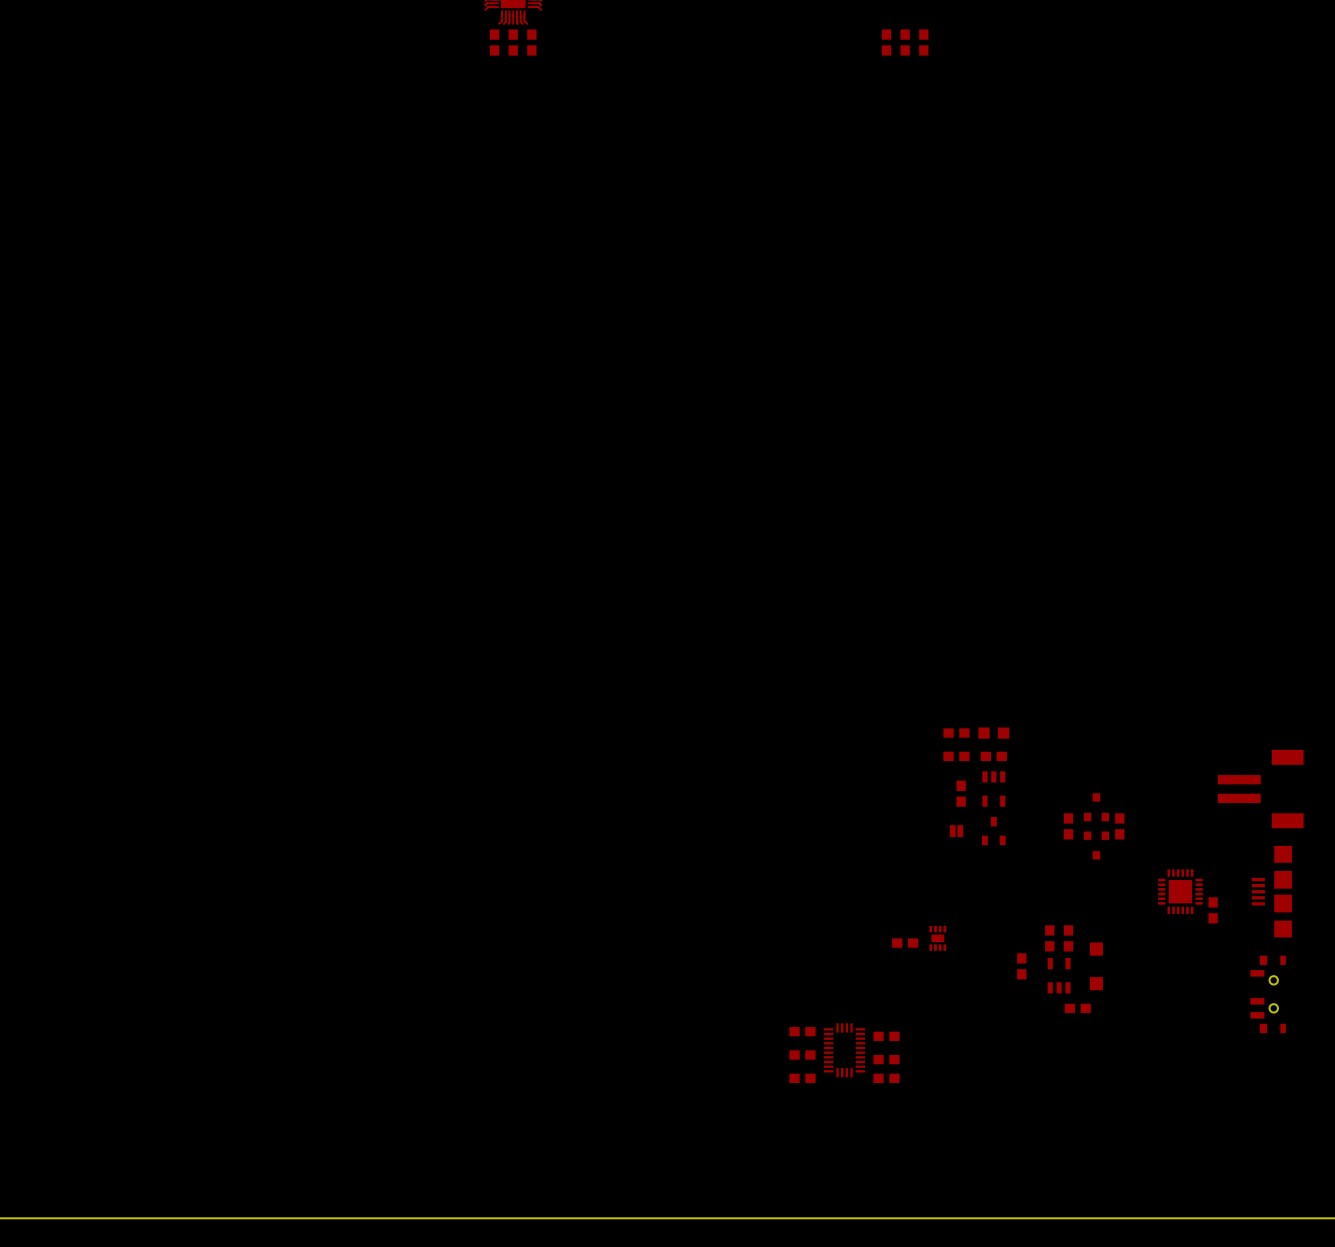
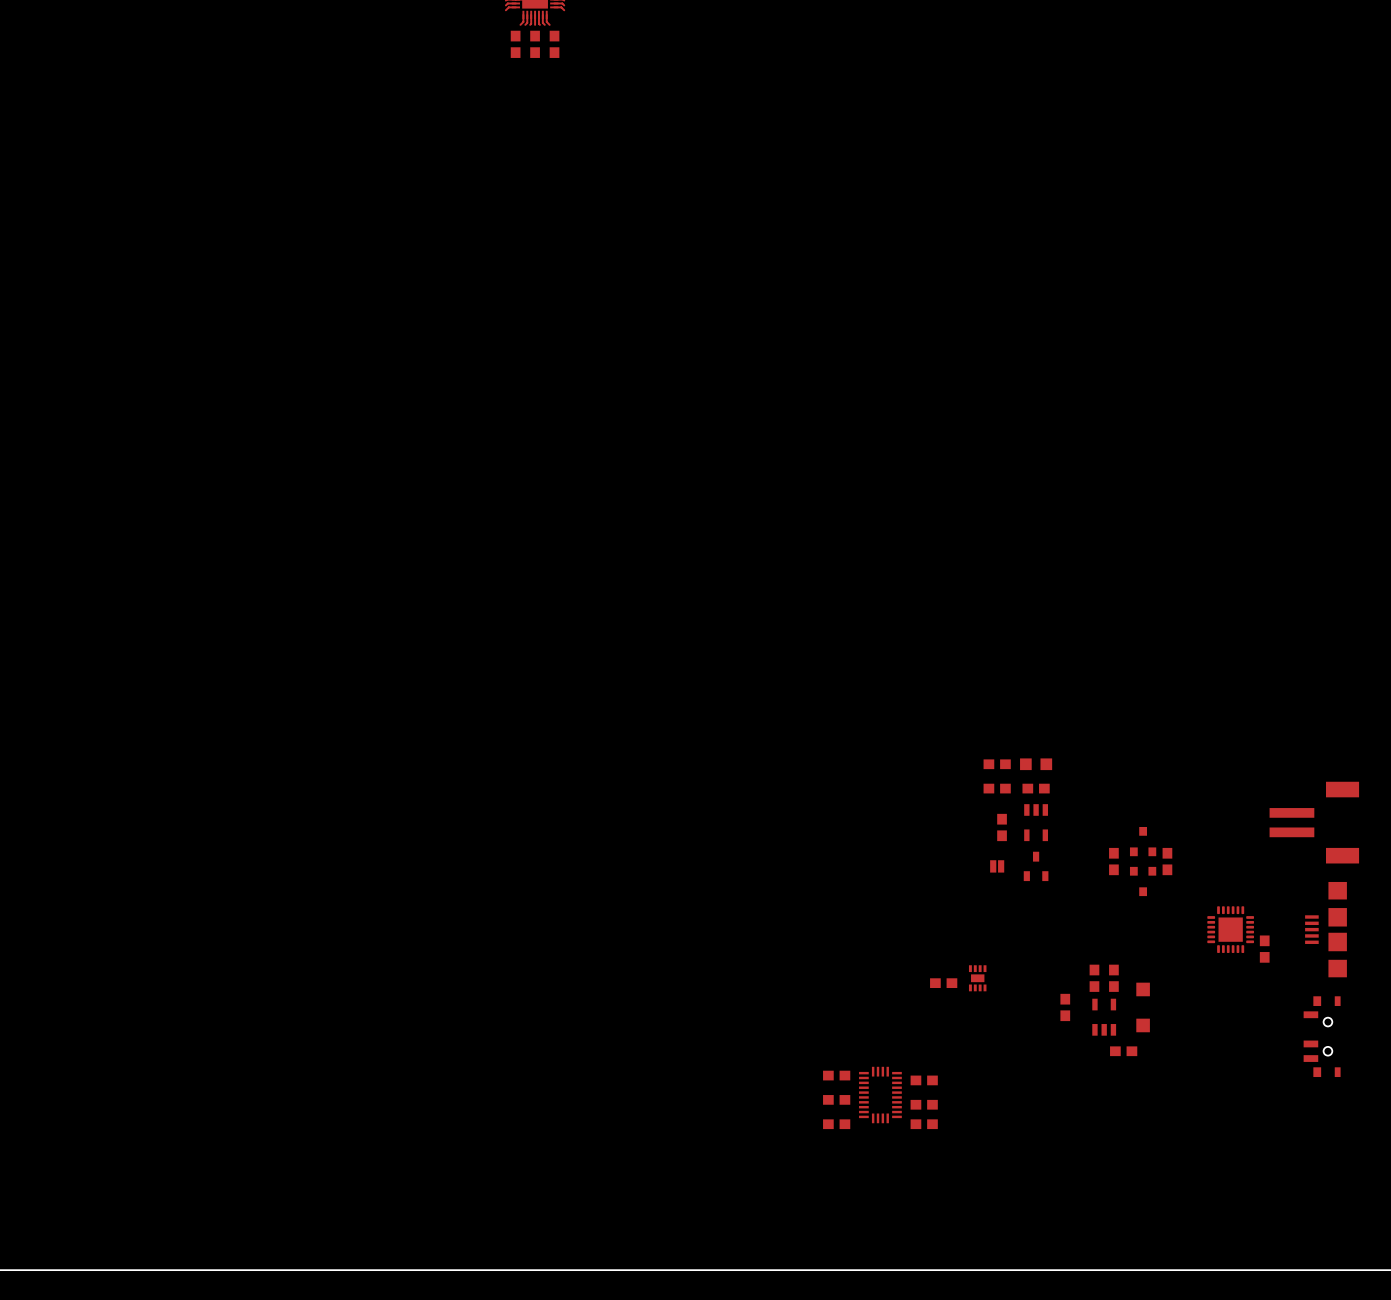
part: (886, 42) -> none
part: (905, 42) -> none
part: (923, 42) -> none

